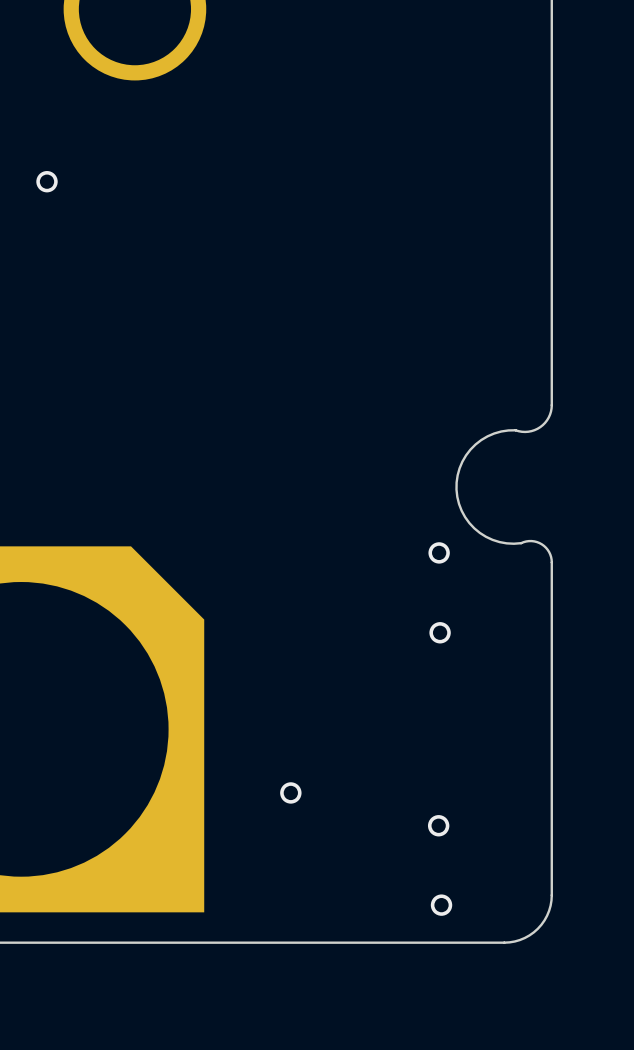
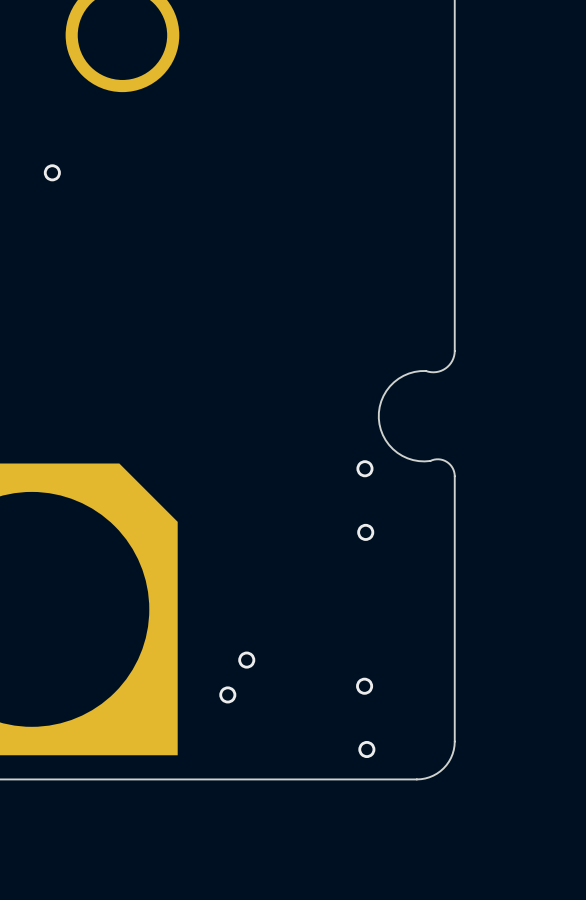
via: none -> (227, 694)

